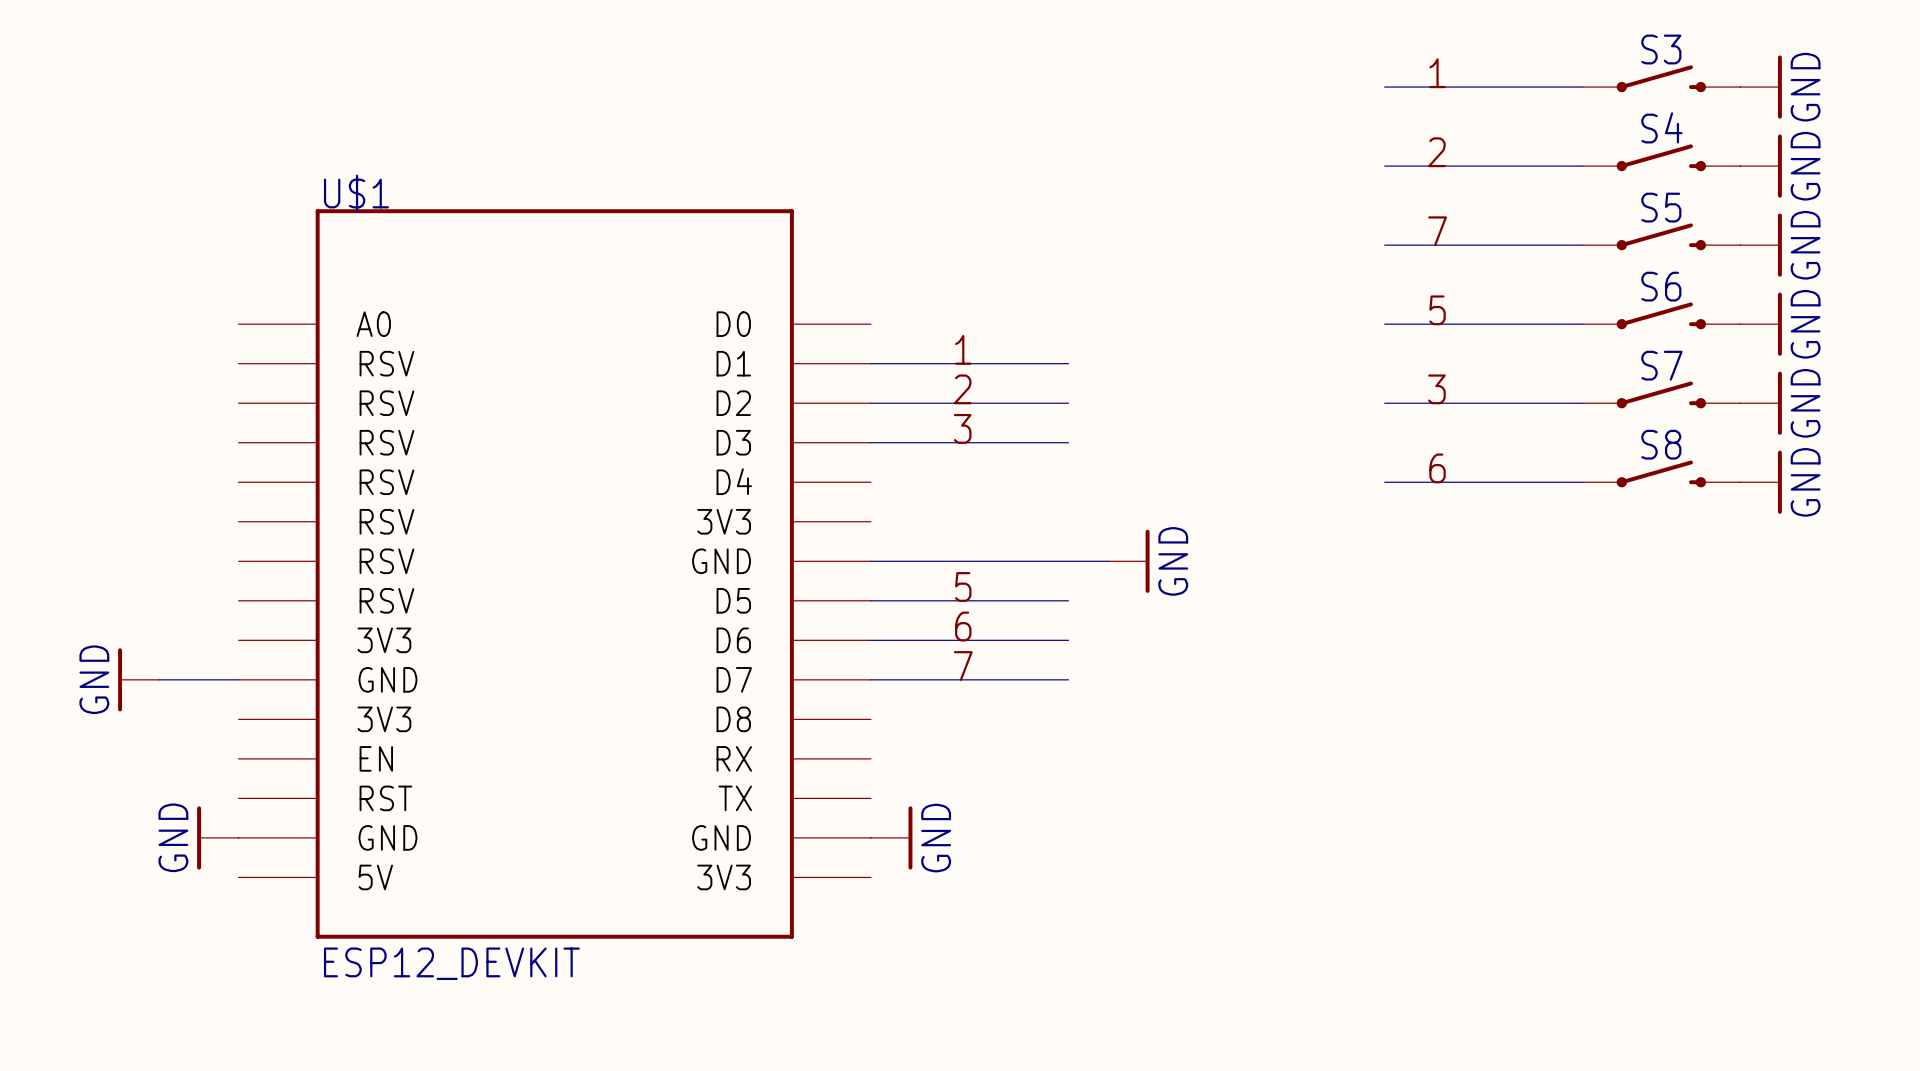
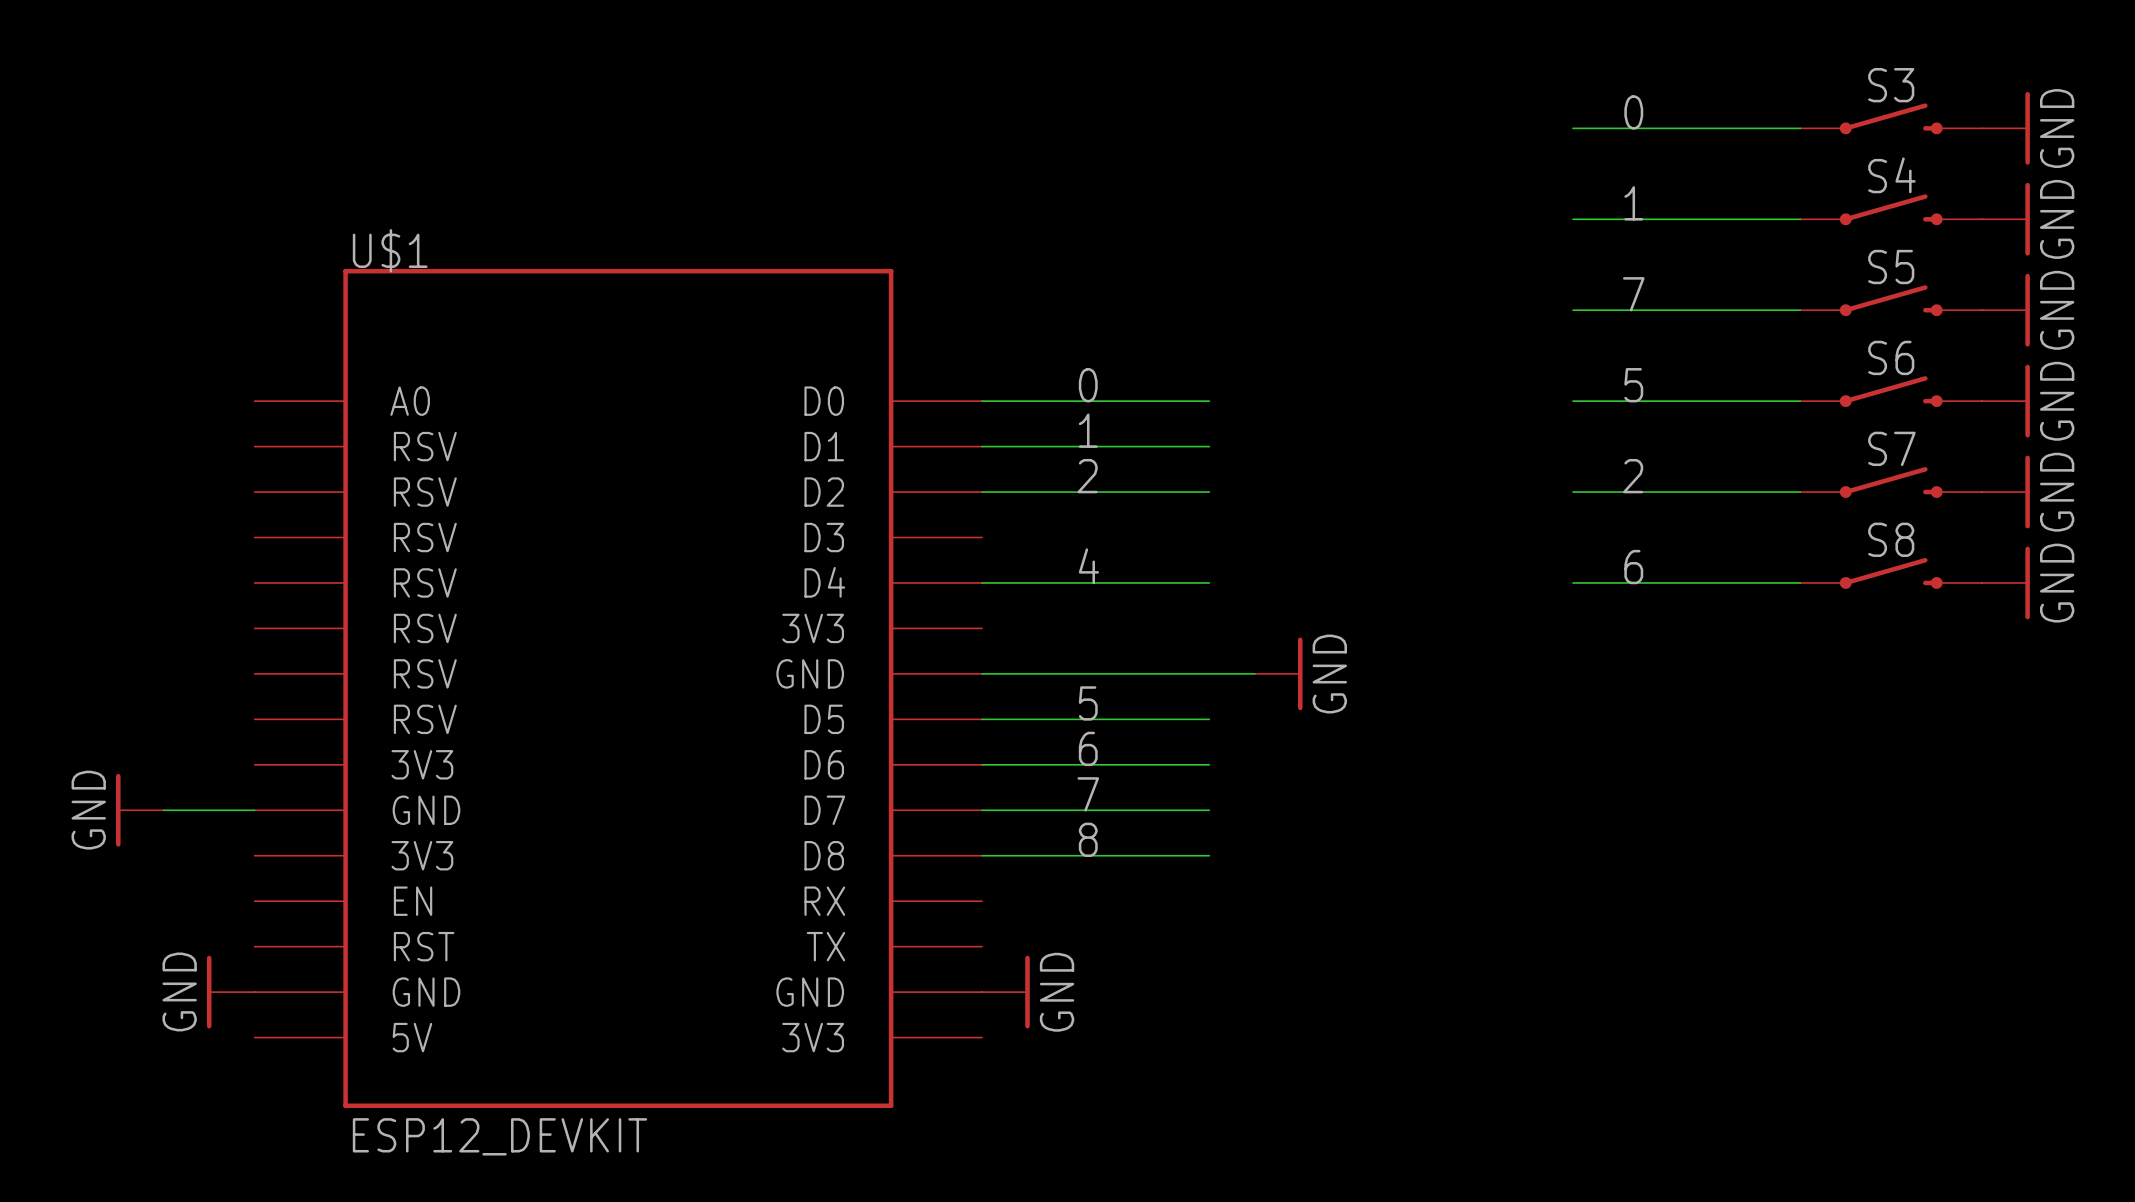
label: 1 (1437, 73) -> 0 (1633, 112)
label: 2 (1436, 152) -> 1 (1633, 203)
label: none -> 0 (1088, 385)
wire: none -> (982, 401) (1209, 401)
label: 3 (1436, 389) -> 2 (1633, 476)
label: 3 (962, 428) -> none
wire: (870, 442) (1068, 442) -> (982, 582) (1209, 582)
label: none -> 4 (1088, 566)
label: none -> 8 (1088, 839)
wire: none -> (982, 855) (1209, 855)

